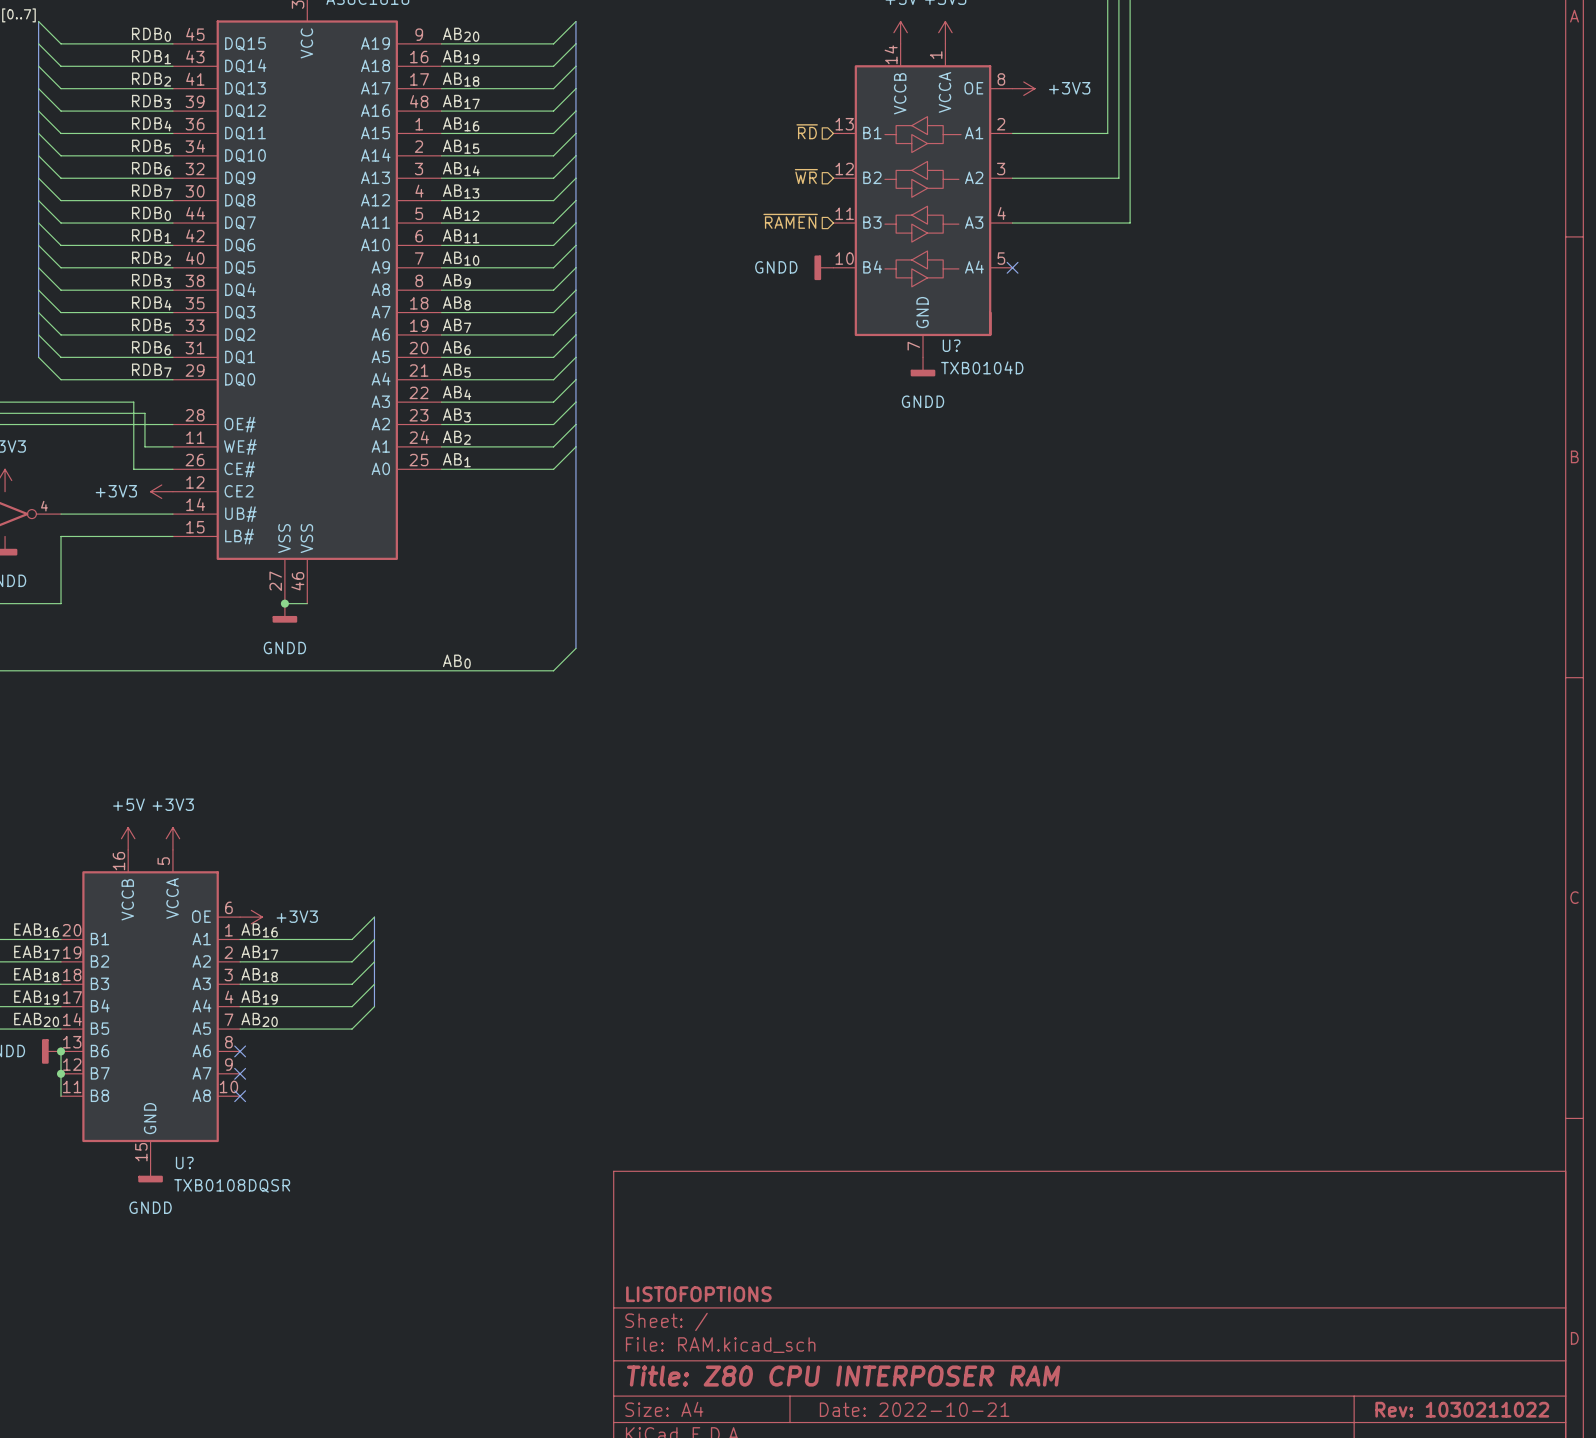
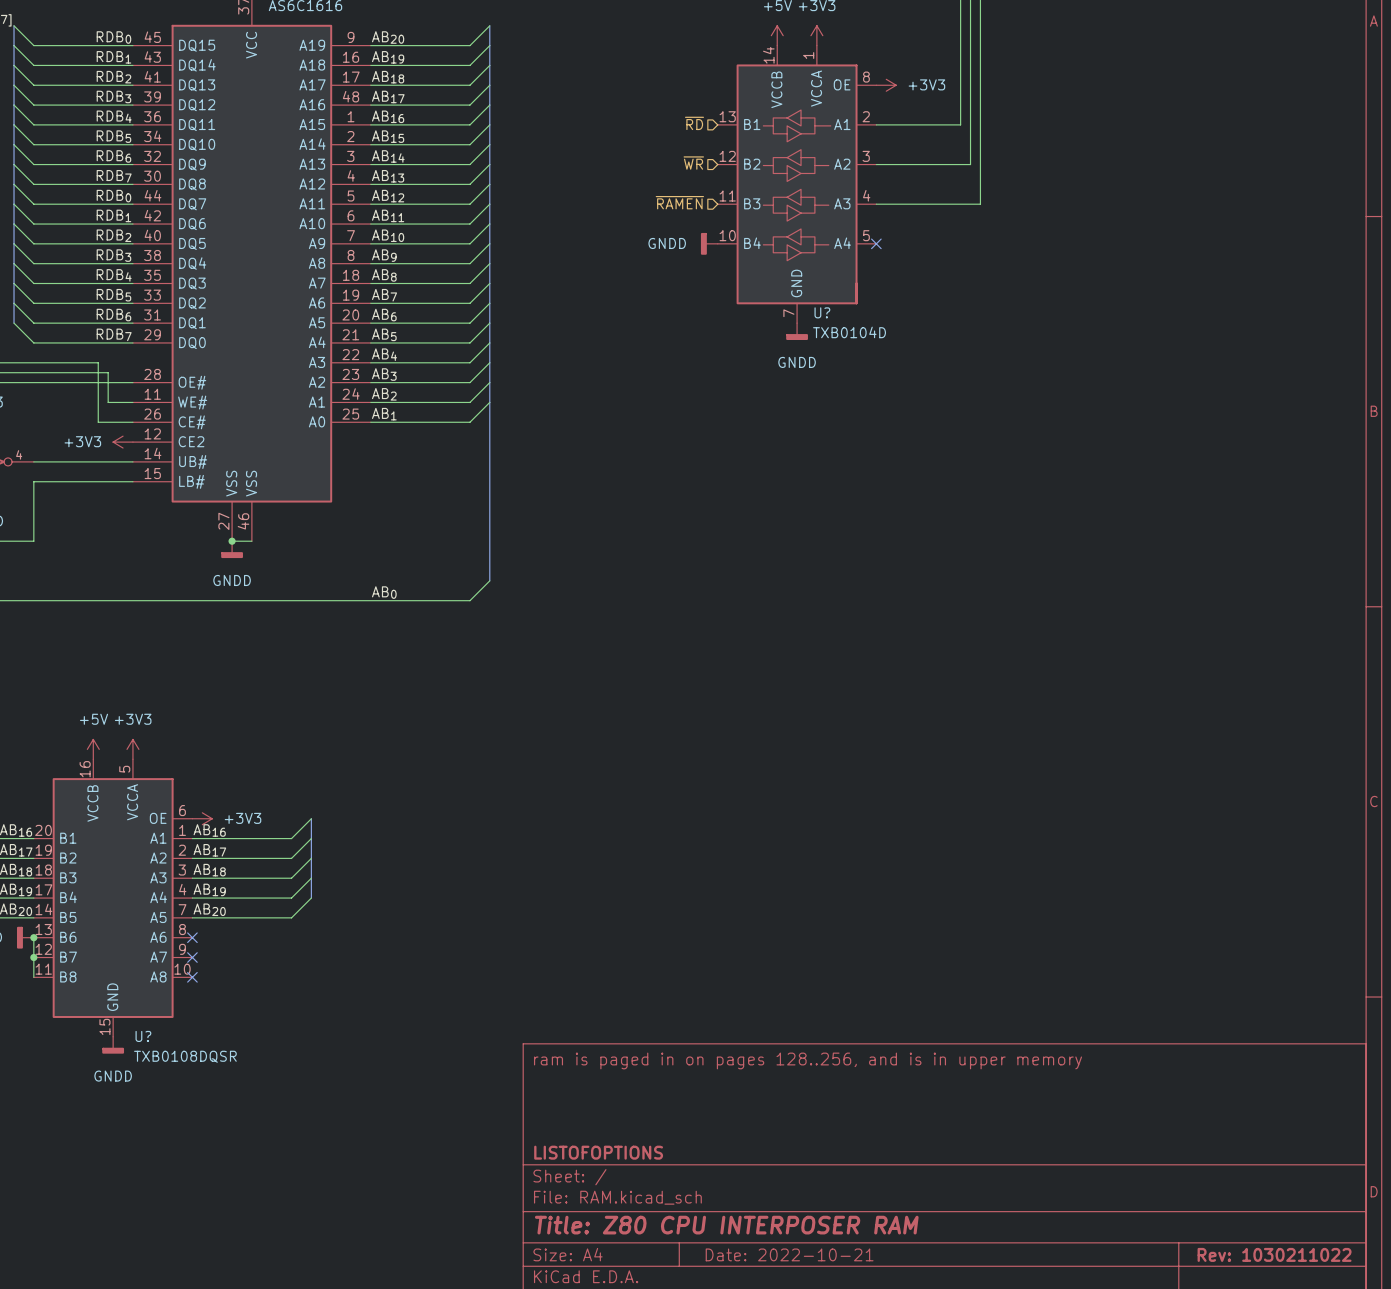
title block: none -> ram is paged in on pages 128..256, and is in upper memory (808, 1060)

